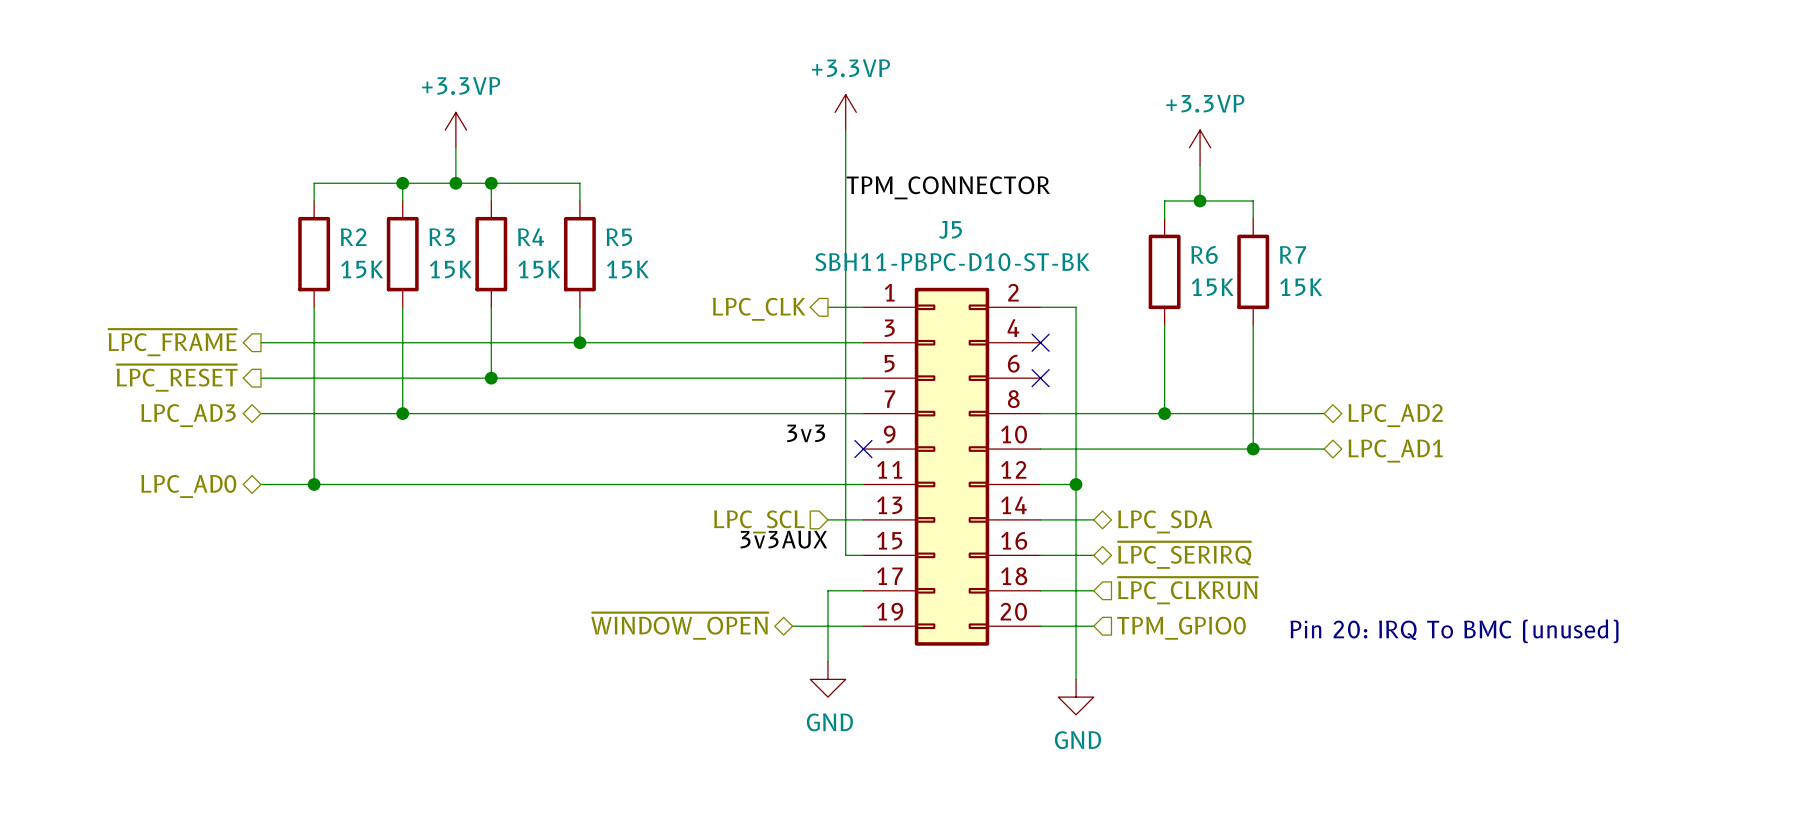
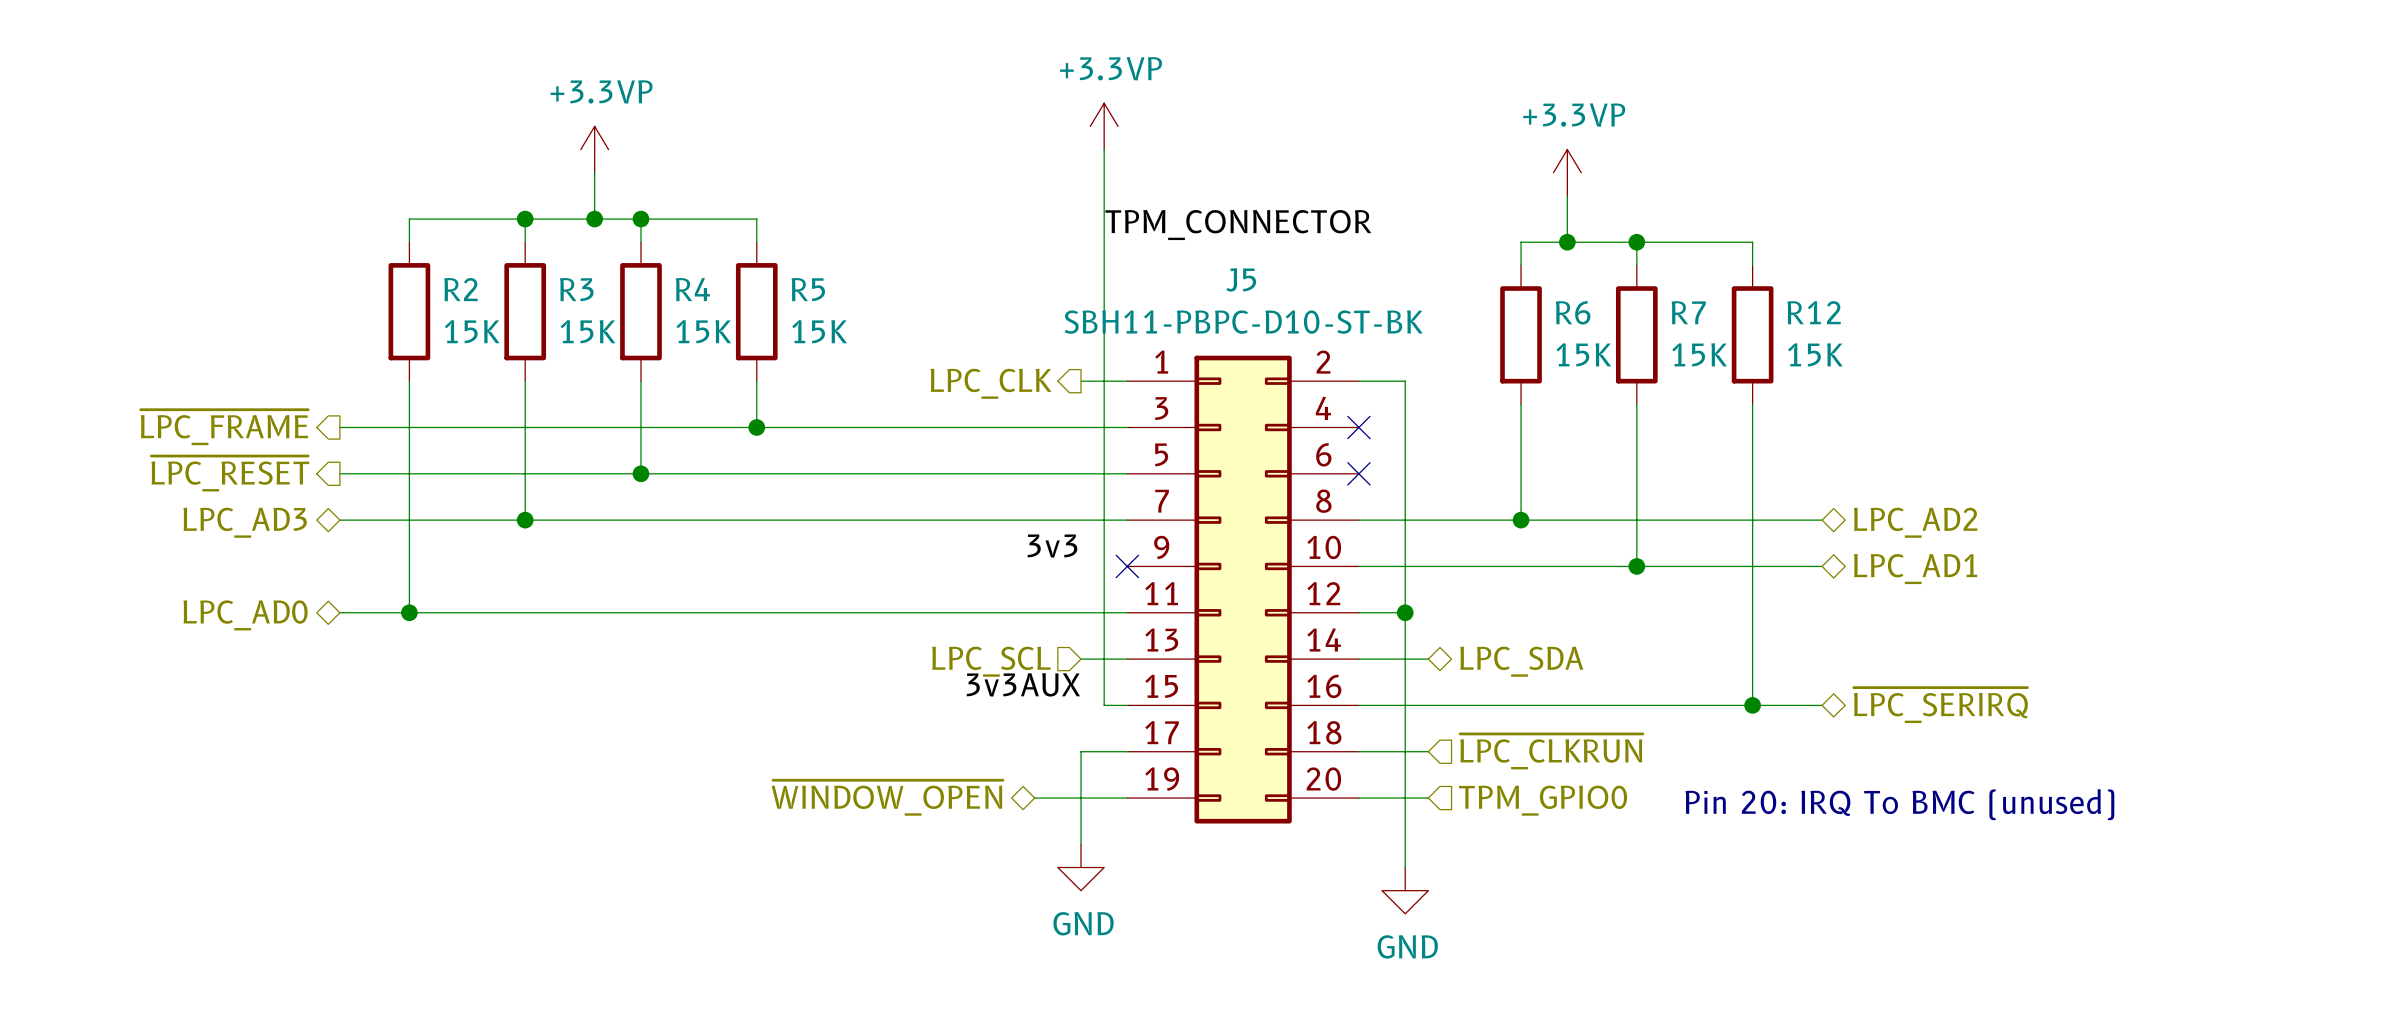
wire: none -> (1636, 242) (1752, 242) (1752, 265)
junction: none -> (1636, 242)
R12: none -> 15K (1752, 334)
wire: none -> (1752, 404) (1752, 705)
wire: none -> (1729, 520) (1822, 520)
hierarchical label position: LPC_AD2 (1395, 415) -> LPC_AD2 (1915, 522)
wire: none -> (1729, 566) (1822, 566)
hierarchical label position: LPC_AD1 (1395, 451) -> LPC_AD1 (1915, 569)
wire: none -> (1428, 705) (1822, 705)
hierarchical label position: ~{LPC_SERIRQ} (1184, 555) -> ~{LPC_SERIRQ} (1940, 705)
junction: none -> (1752, 705)

